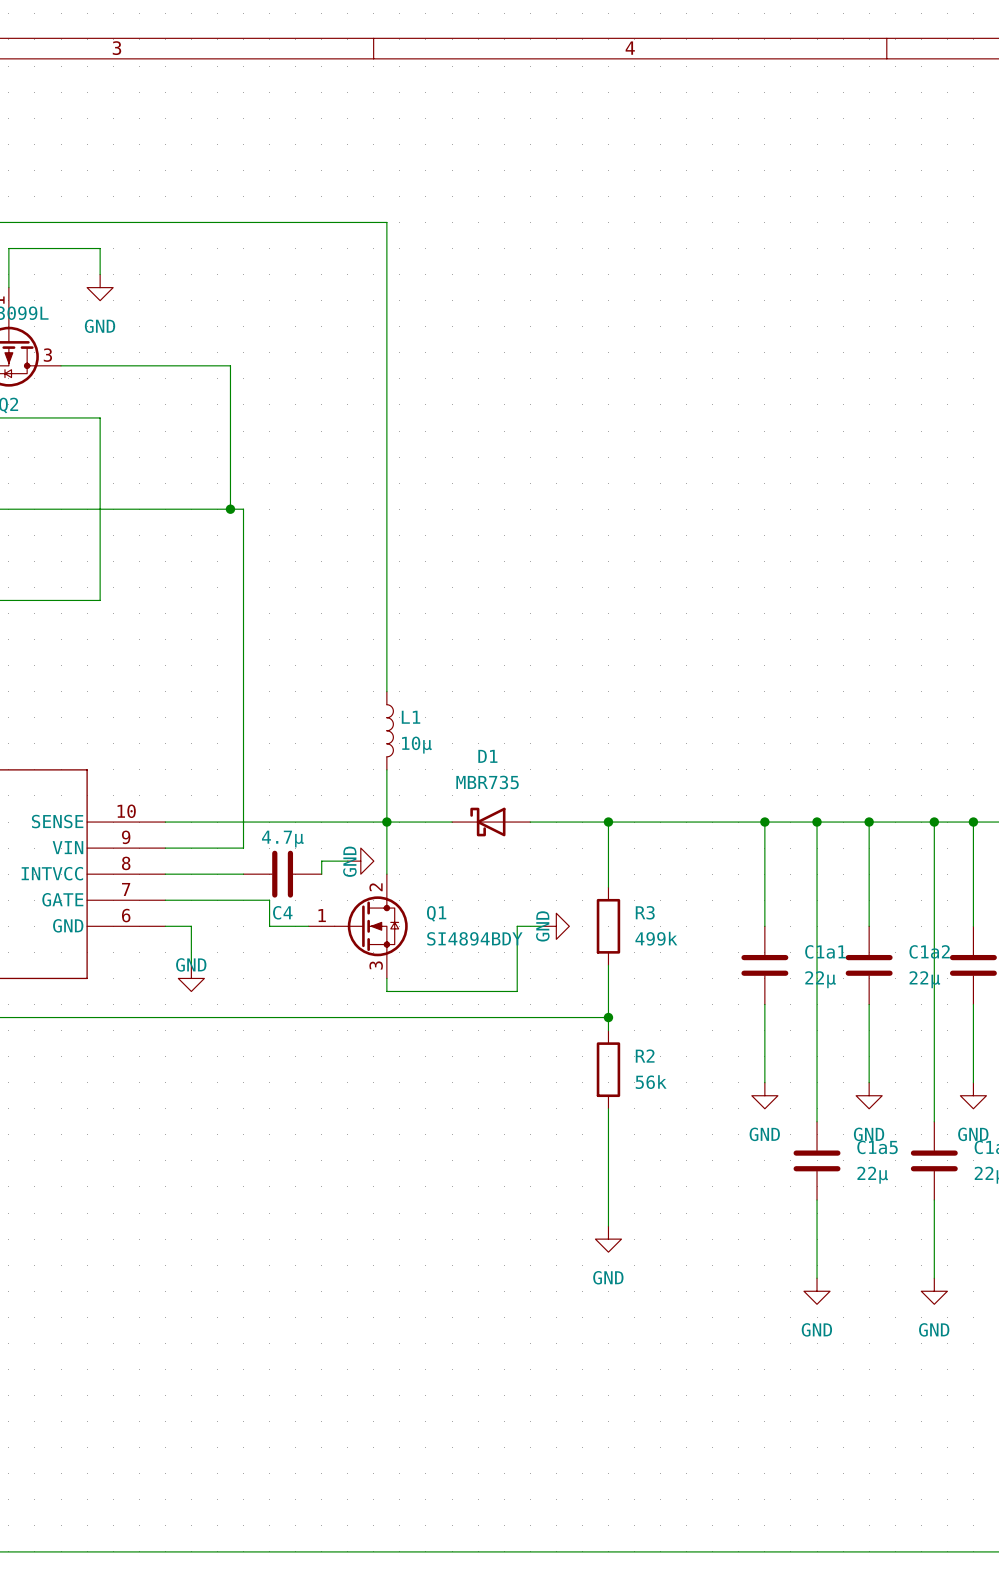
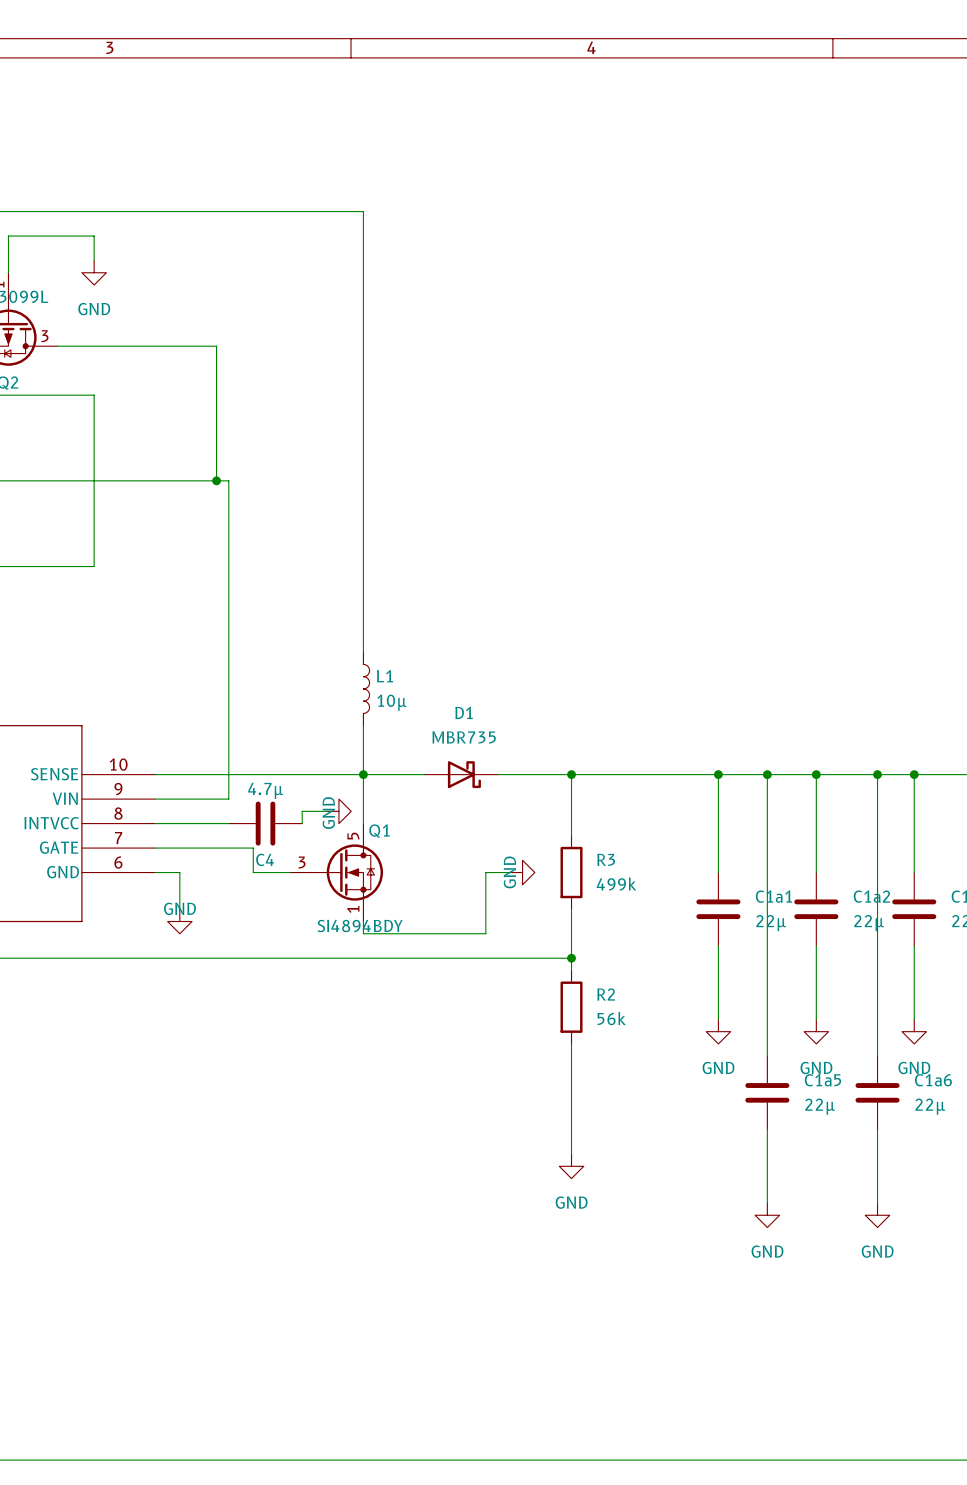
D1 rotation: 0° (487, 822) -> 180° (464, 774)
Q1 pin number: 2 (376, 887) -> 5 (353, 836)
Q1 name position: Q1 (436, 913) -> Q1 (379, 831)
Q1 pin number: 1 (322, 915) -> 3 (302, 862)
Q1 value position: SI4894BDY (474, 938) -> SI4894BDY (360, 926)
Q1 pin number: 3 (376, 965) -> 1 (353, 909)

